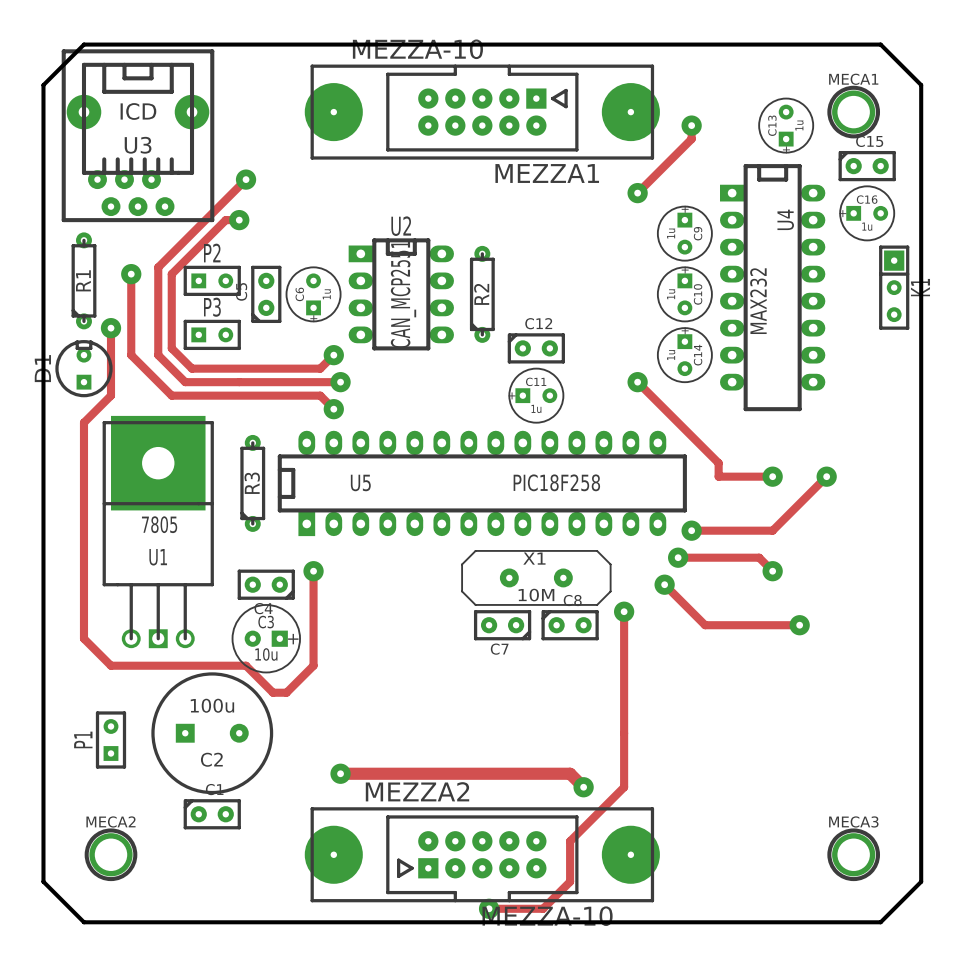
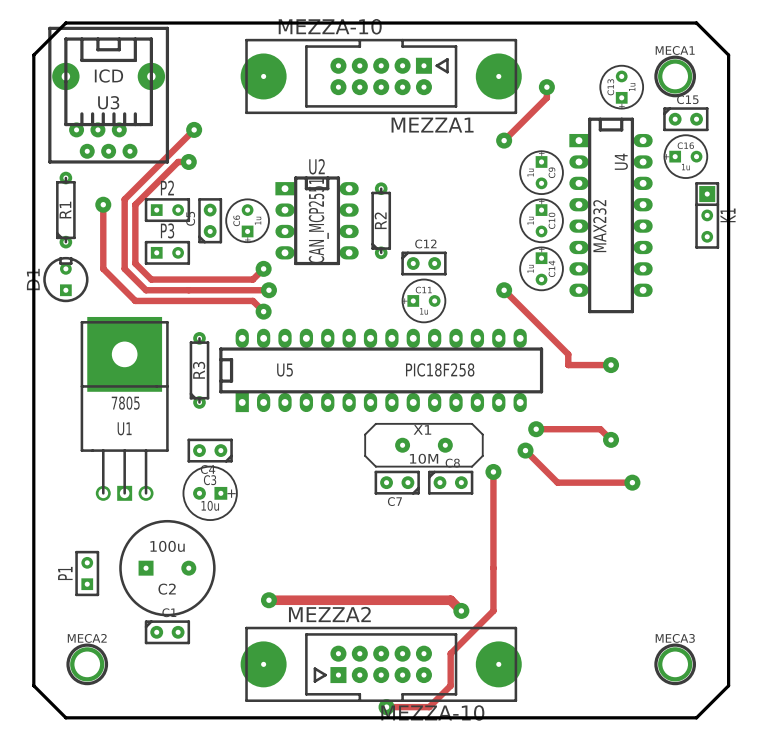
track: (110, 328) (110, 395) (83, 422) (83, 638) (110, 665) (246, 665) (273, 692) (286, 692) (313, 665) (313, 571) -> none
via: (110, 328) -> none
track: (826, 476) (772, 530) (691, 530) -> none
via: (826, 476) -> none
via: (691, 530) -> none
via: (313, 571) -> none

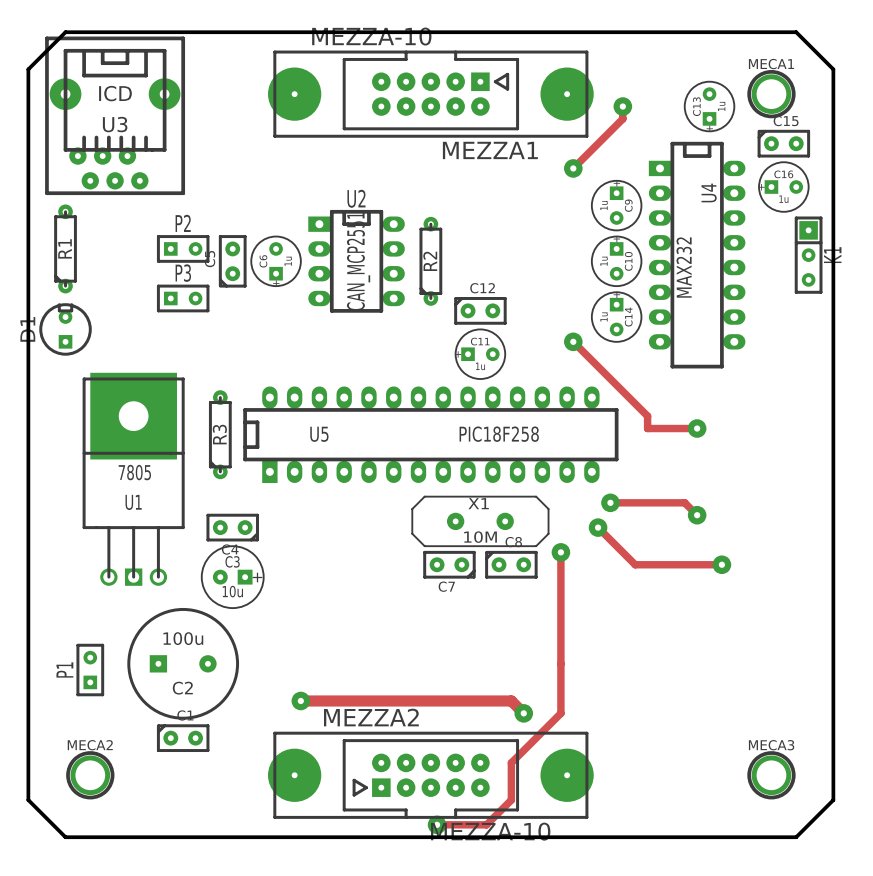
track: (194, 129) (124, 199) (124, 268) (146, 290) (268, 290) -> none
via: (194, 129) -> none
track: (188, 161) (178, 161) (135, 204) (135, 263) (151, 279) (252, 279) (263, 268) -> none
via: (188, 161) -> none
track: (103, 204) (103, 268) (135, 300) (252, 300) (263, 311) -> none
via: (103, 204) -> none
via: (263, 268) -> none
via: (268, 290) -> none
via: (263, 311) -> none

